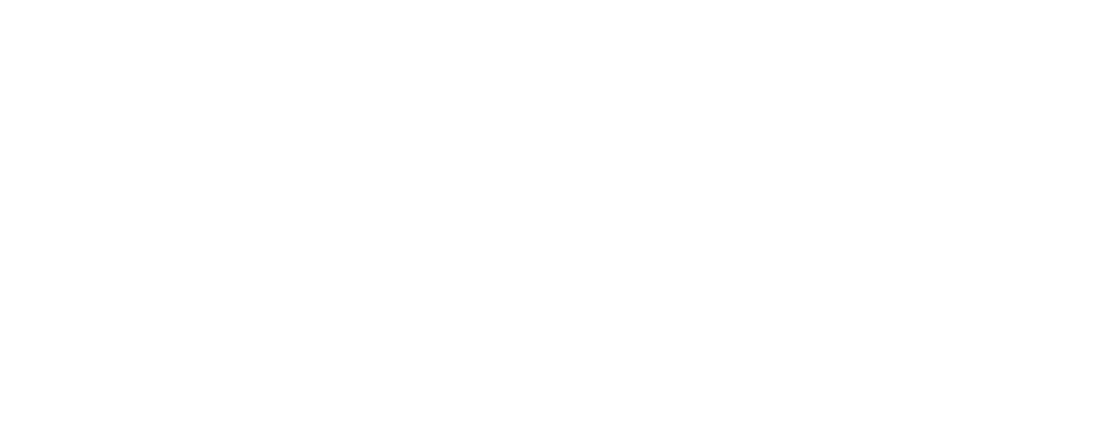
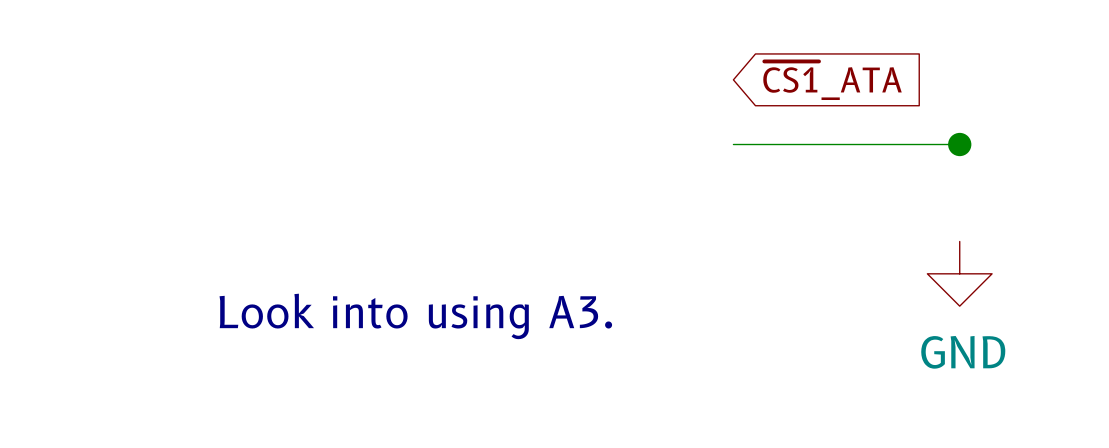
global label: none -> ~{CS1}_ATA (832, 80)
wire: none -> (733, 144) (959, 144)
junction: none -> (959, 144)
power symbol: none -> GND (959, 273)
text: none -> Look into using A3. (415, 316)

